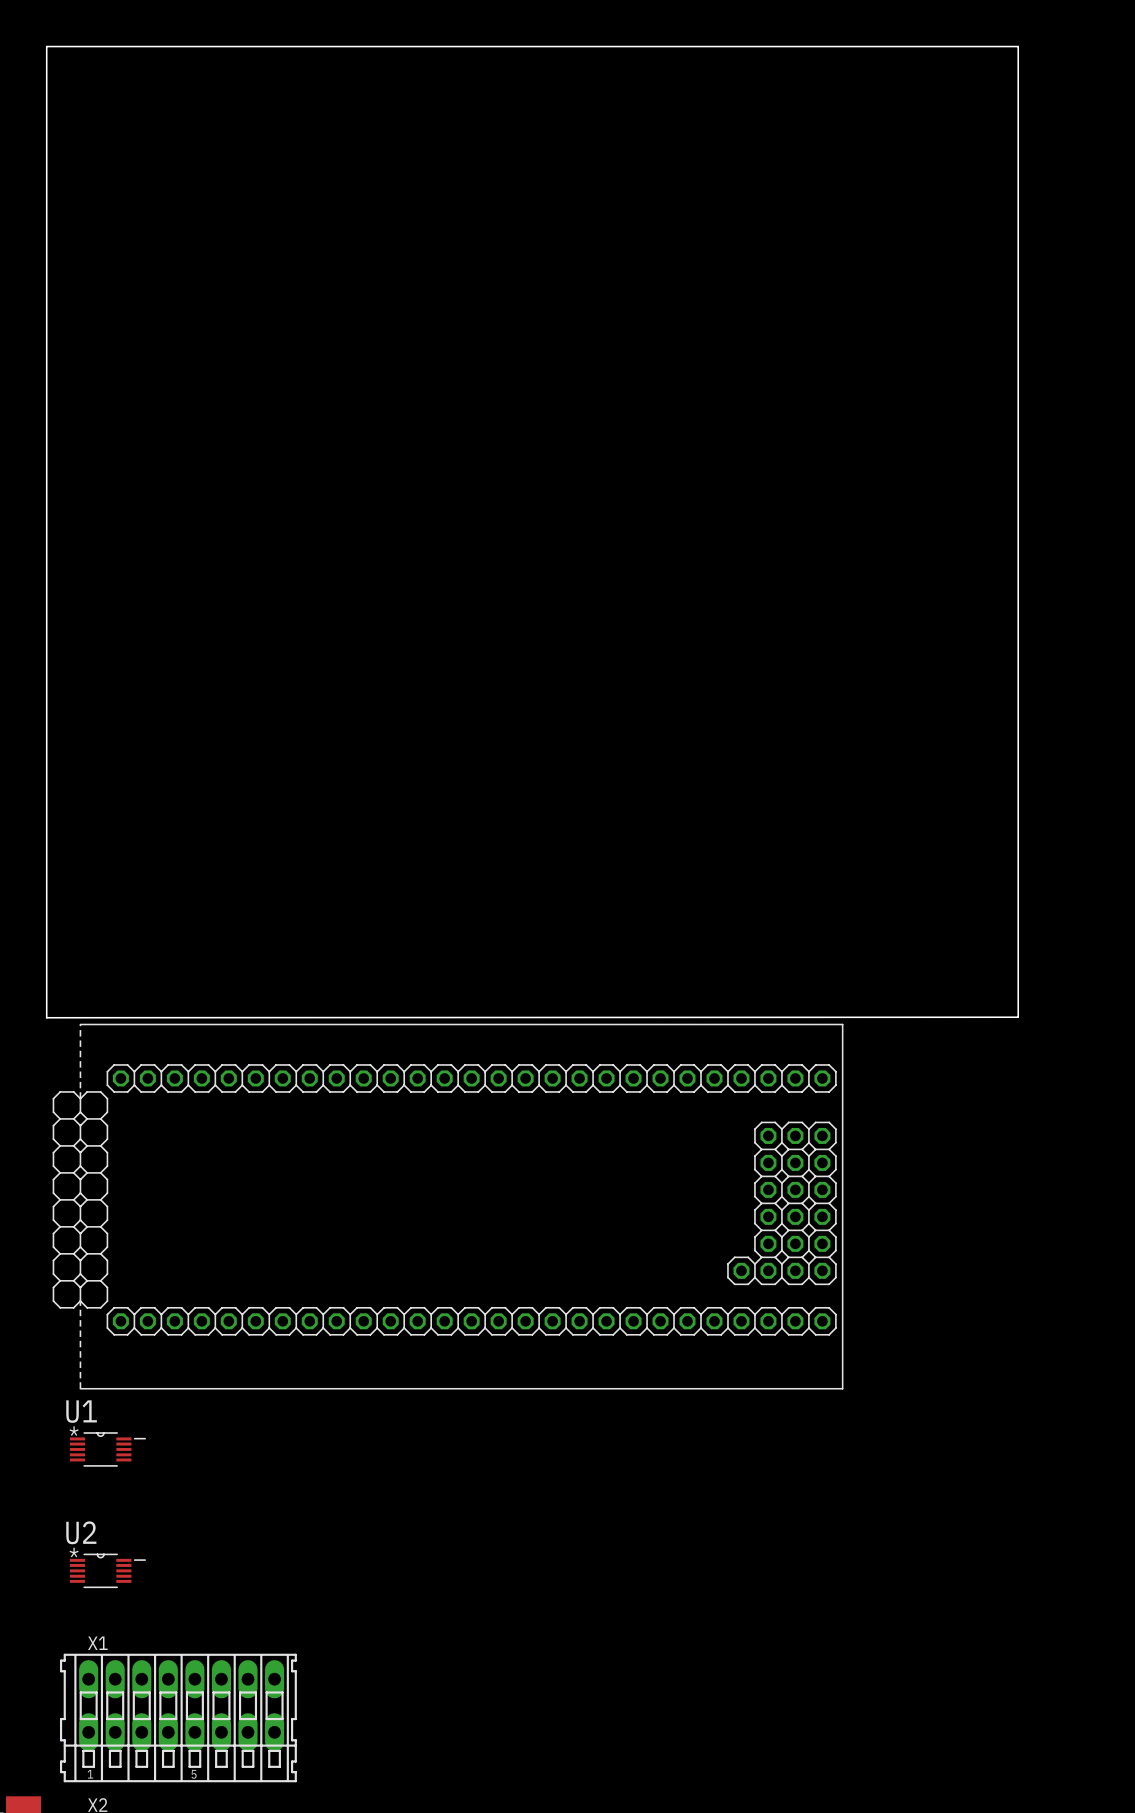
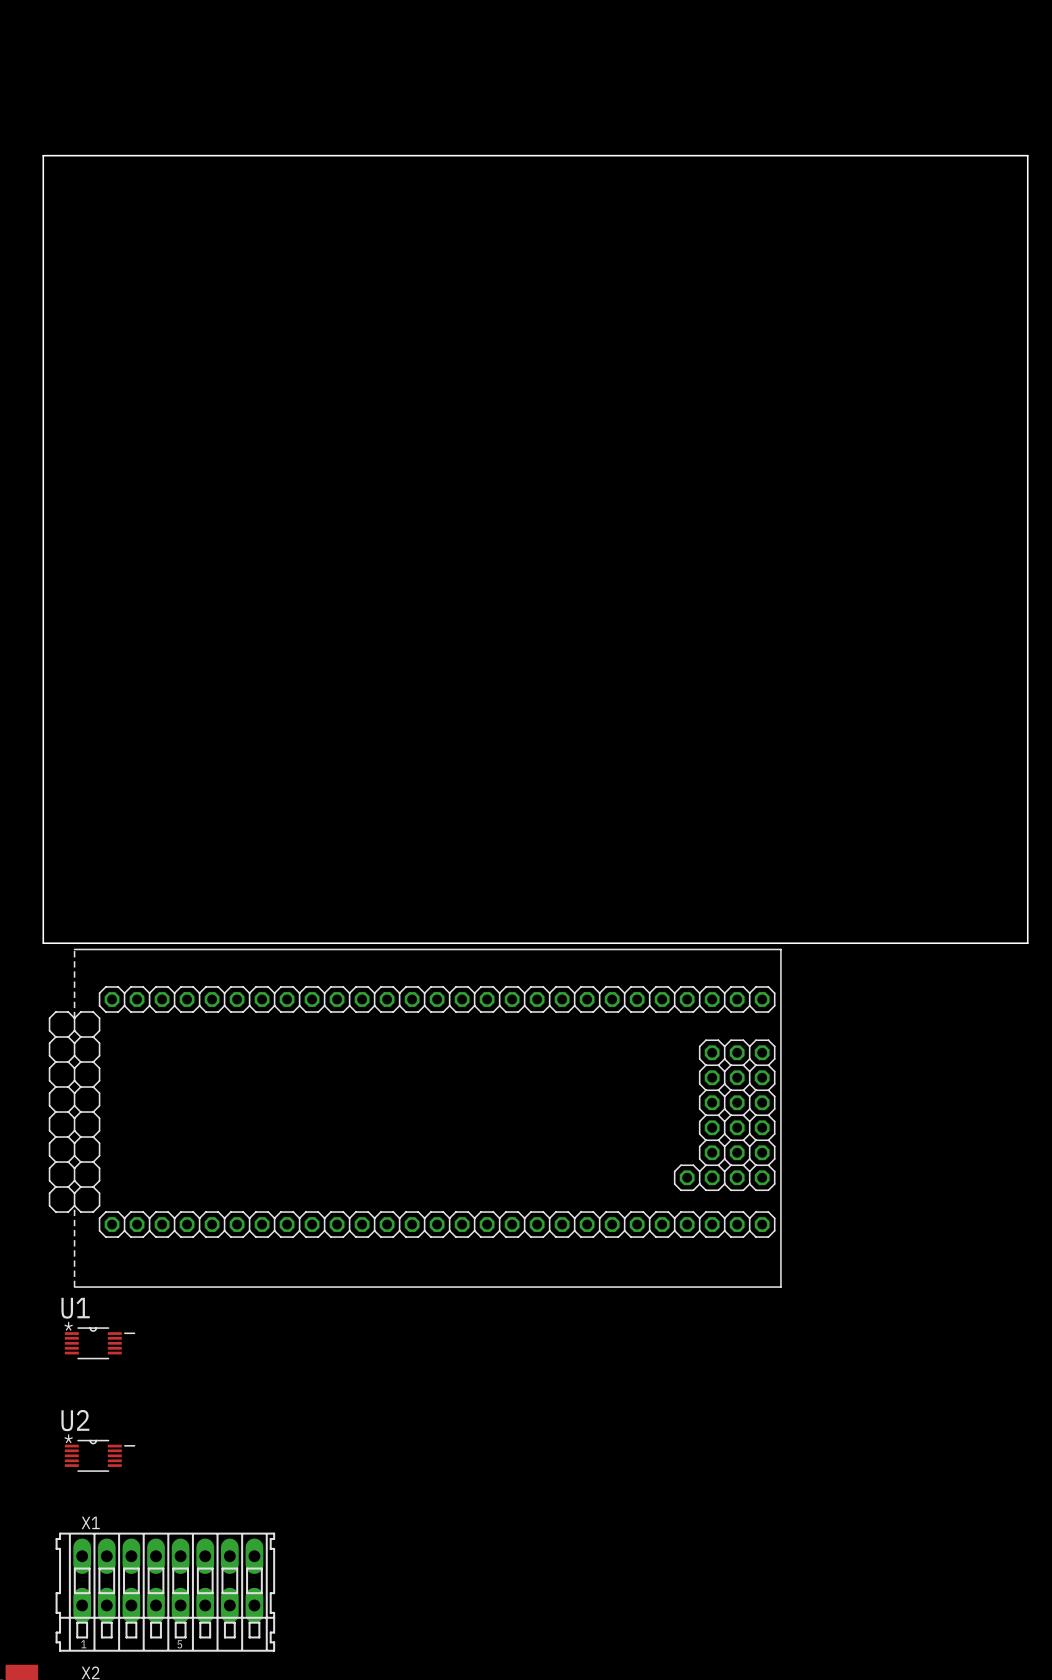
board edge: (46, 167) (46, 46) (1018, 46) (1018, 1017) (46, 1017) -> (43, 155) (1027, 155) (1027, 943) (43, 943)

